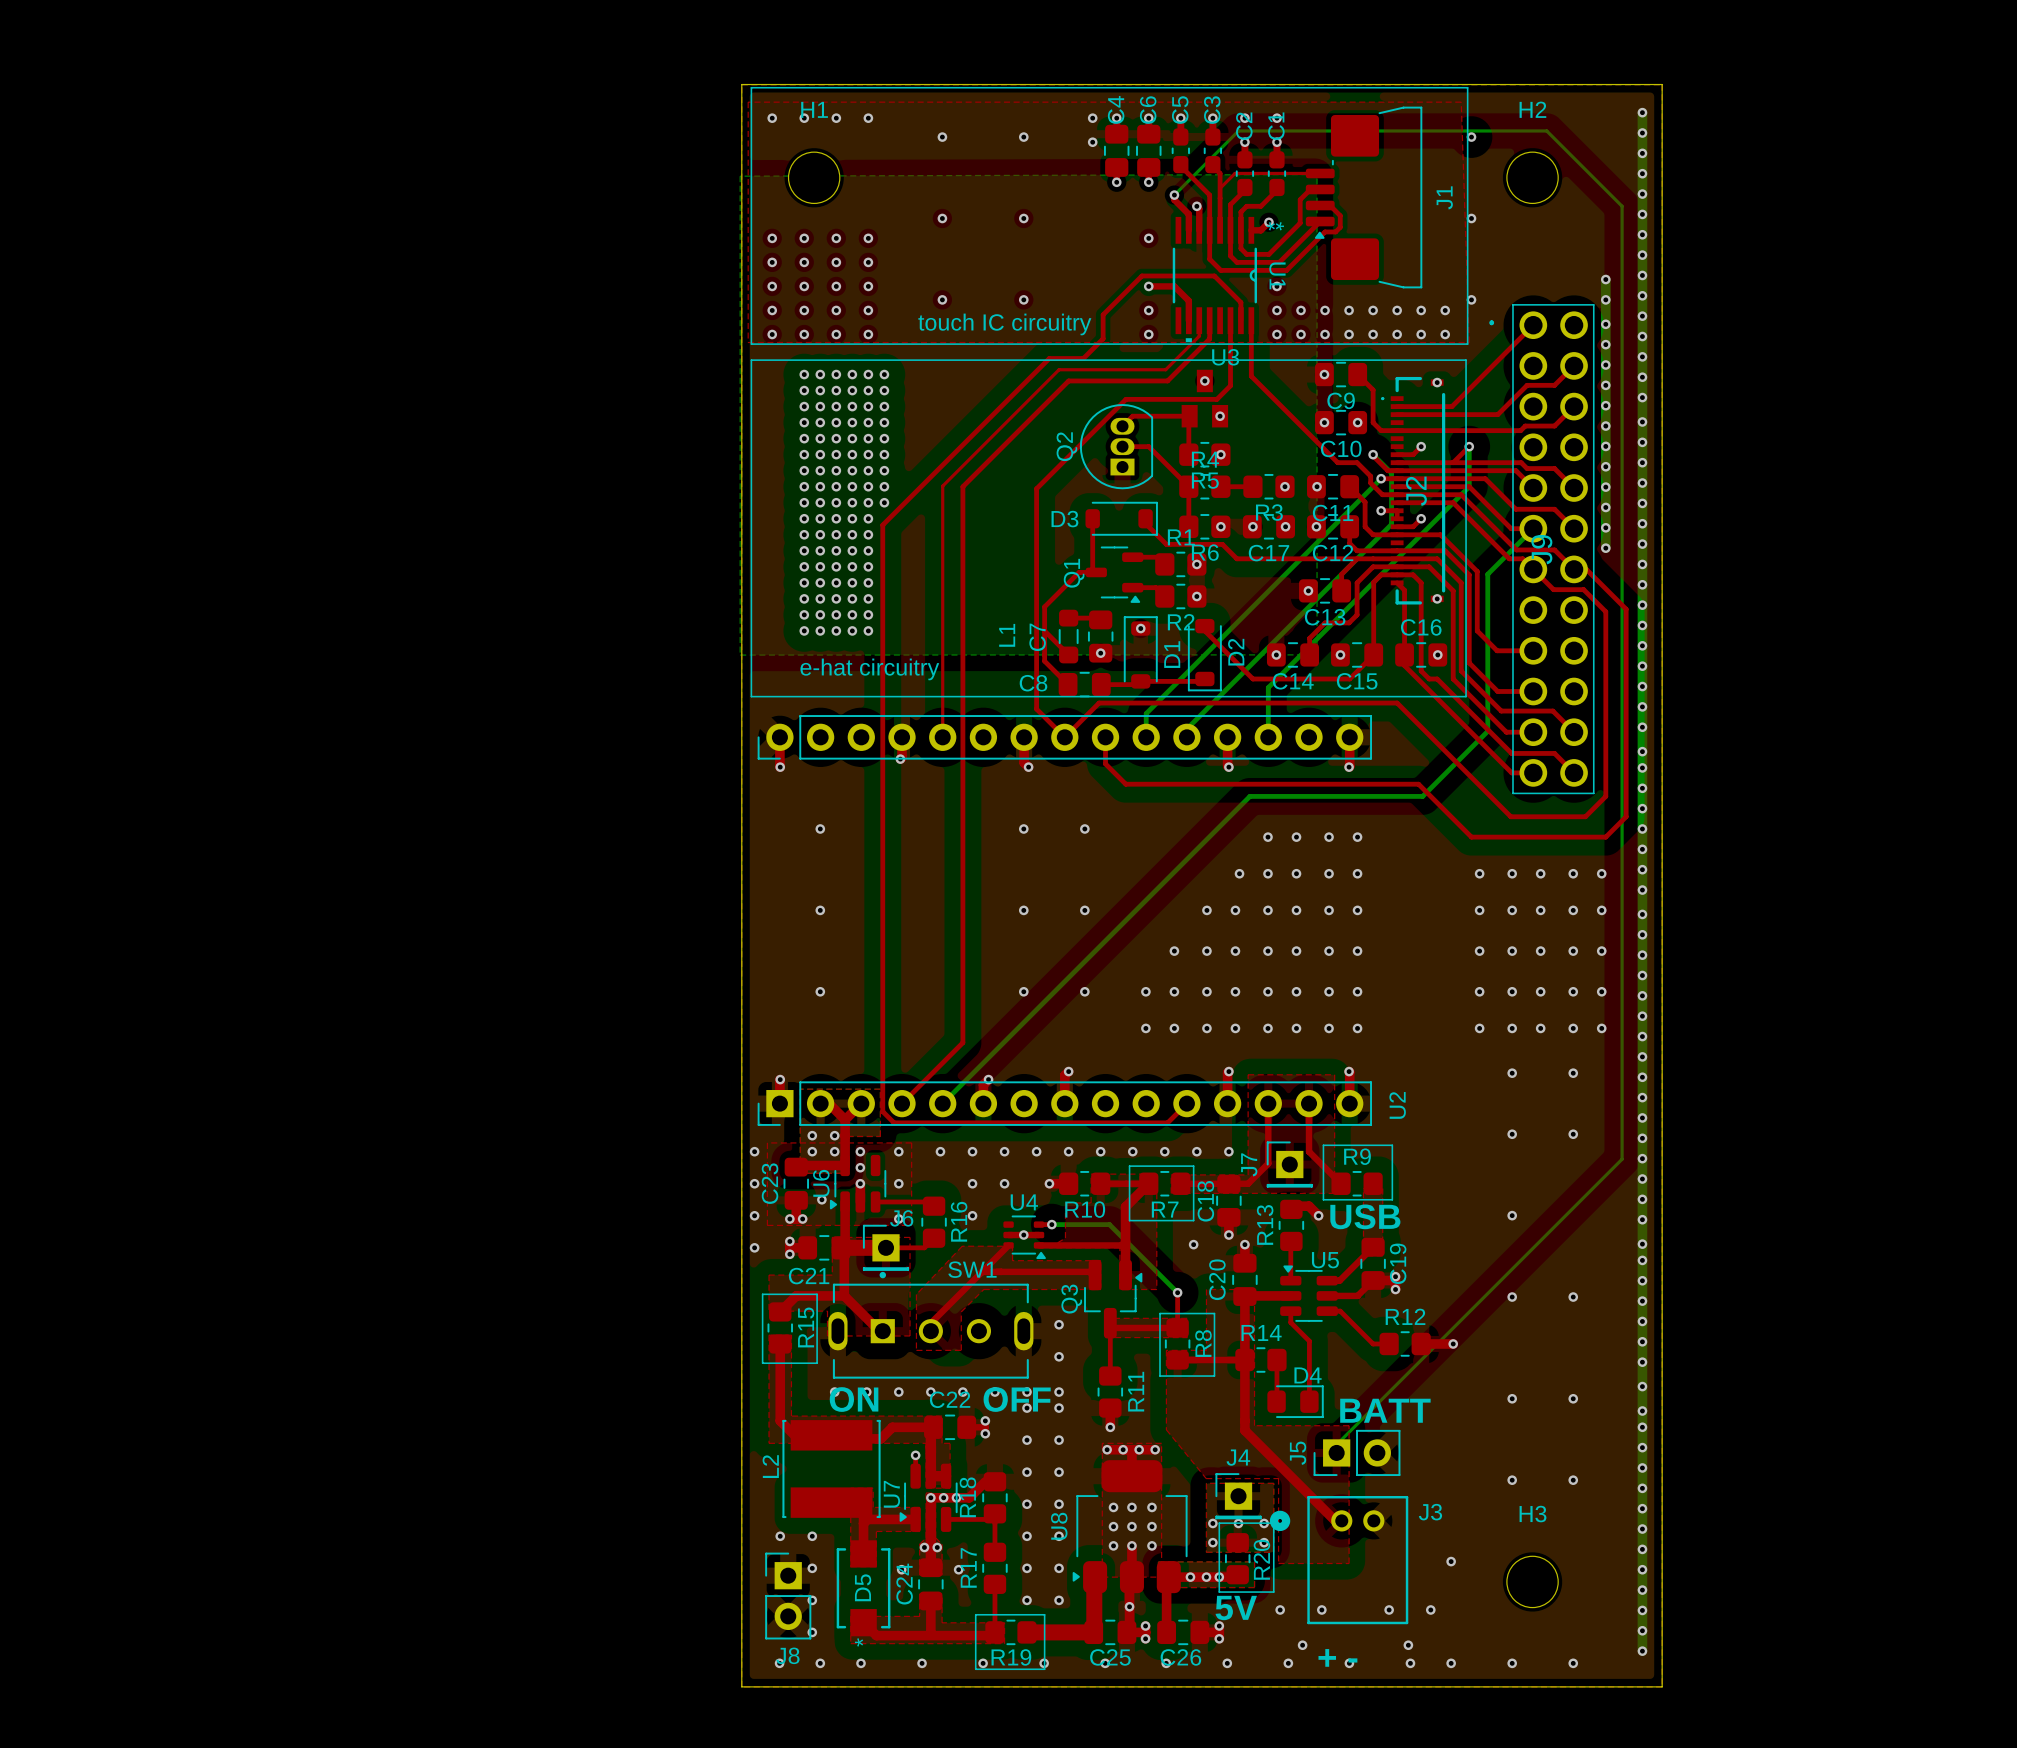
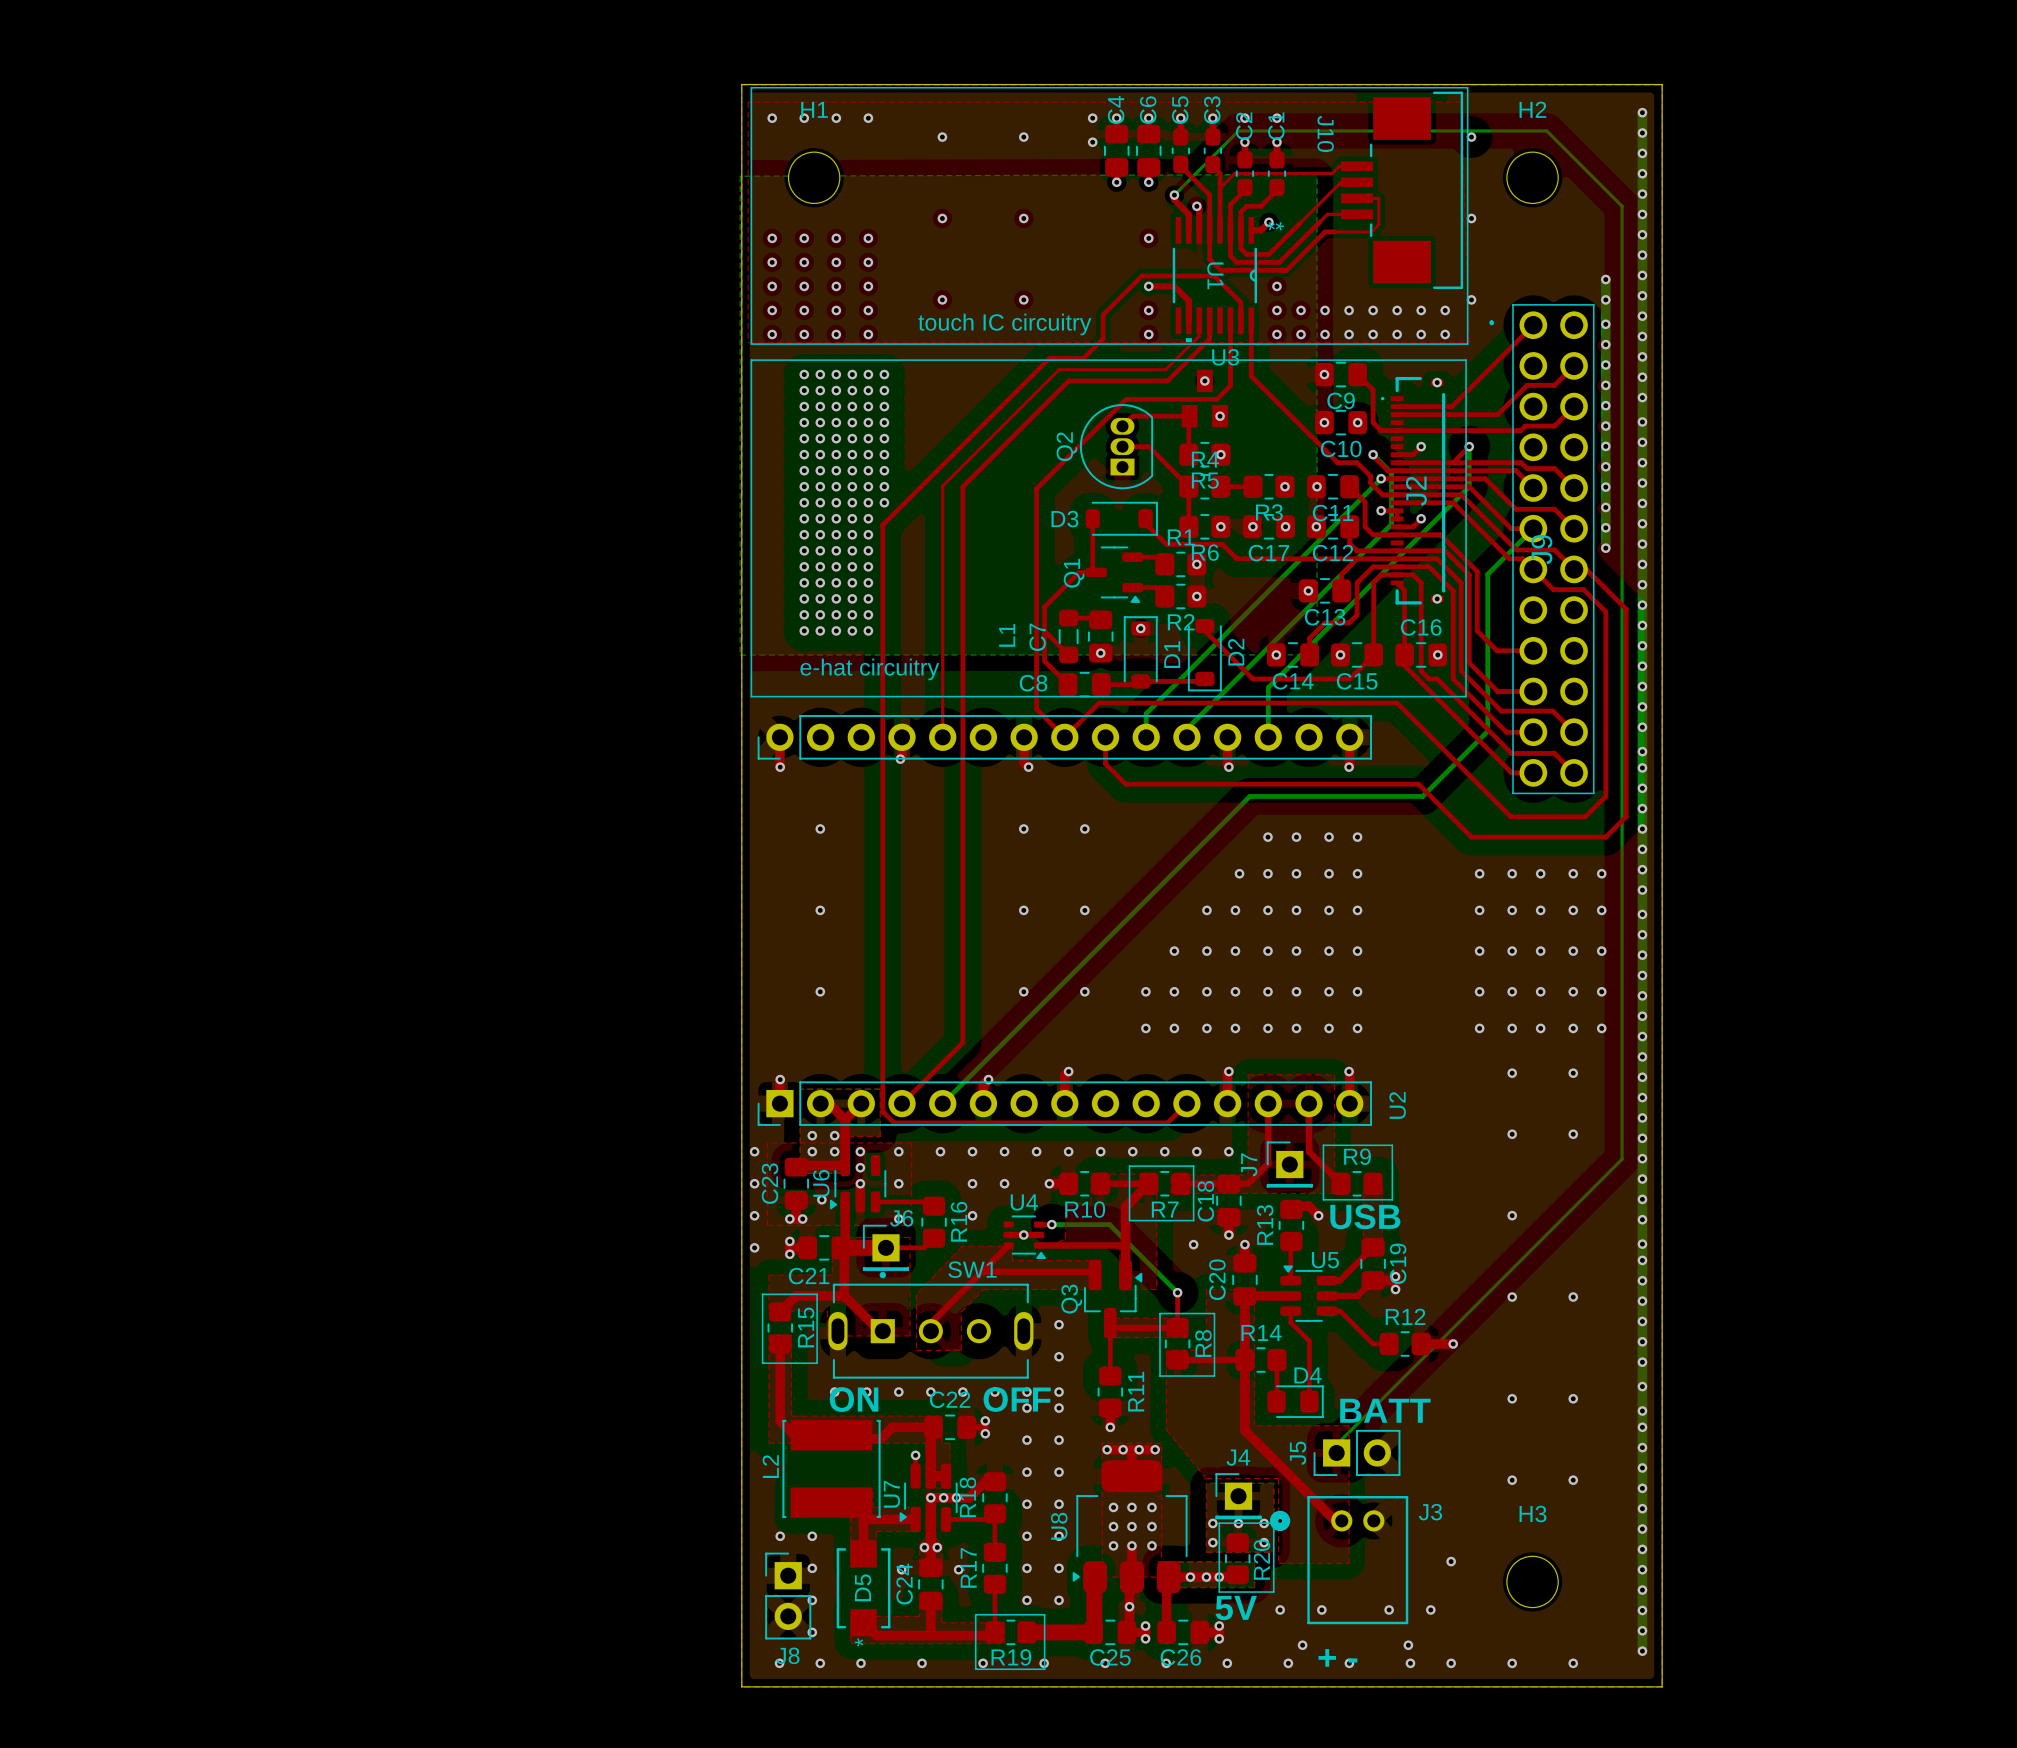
top track: none -> (1357, 166) (1339, 166) (1332, 173) (1320, 173)
top track: (1320, 189) (1310, 189) (1300, 199) (1300, 223) -> (1357, 182) (1341, 182) (1300, 223)
J10: none -> (1402, 190)
J1: (1364, 197) -> none
top track: (1320, 205) (1330, 205) (1340, 215) (1340, 227) (1335, 231) -> (1357, 198) (1378, 199) (1378, 224) (1371, 231) (1335, 231)
top track: none -> (1357, 214) (1327, 214) (1320, 221)
U1 name position: U1 (1277, 275) -> U1 (1215, 275)

